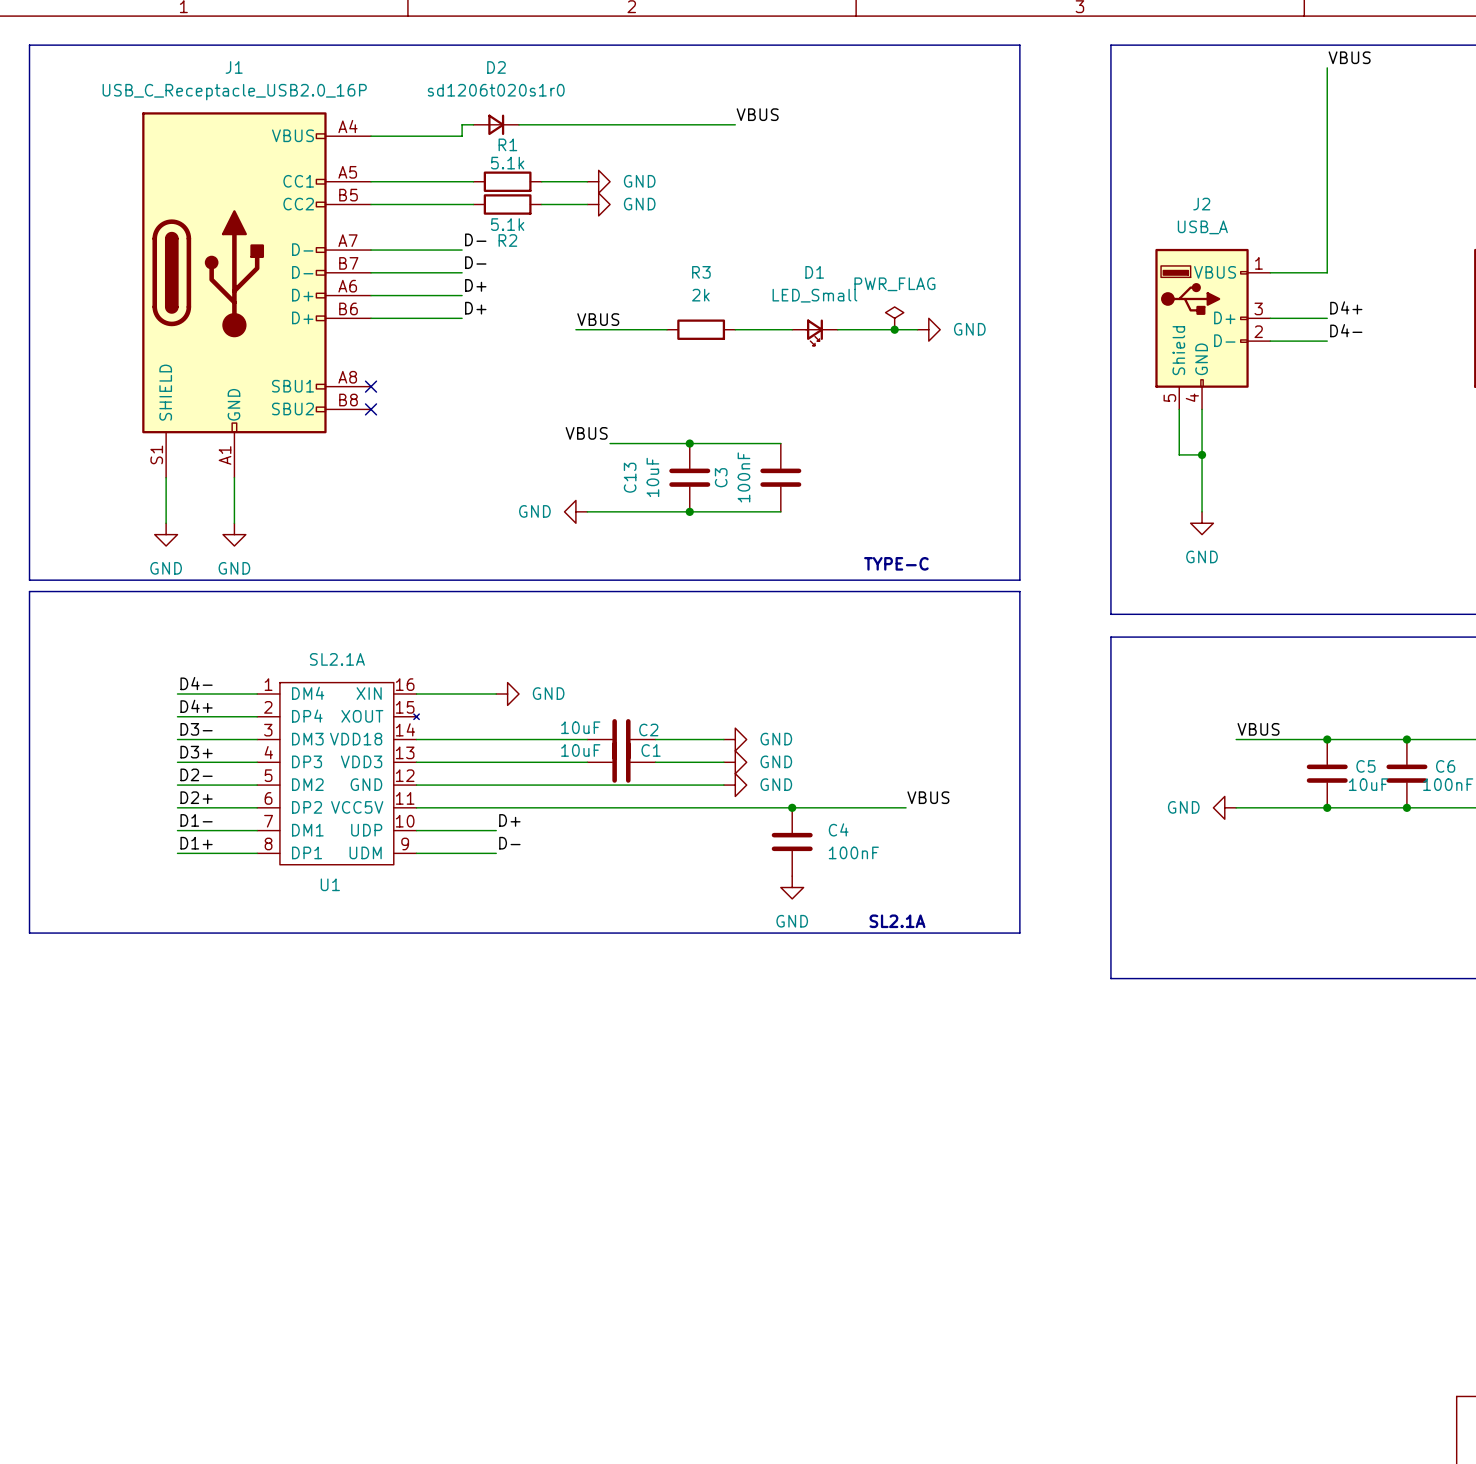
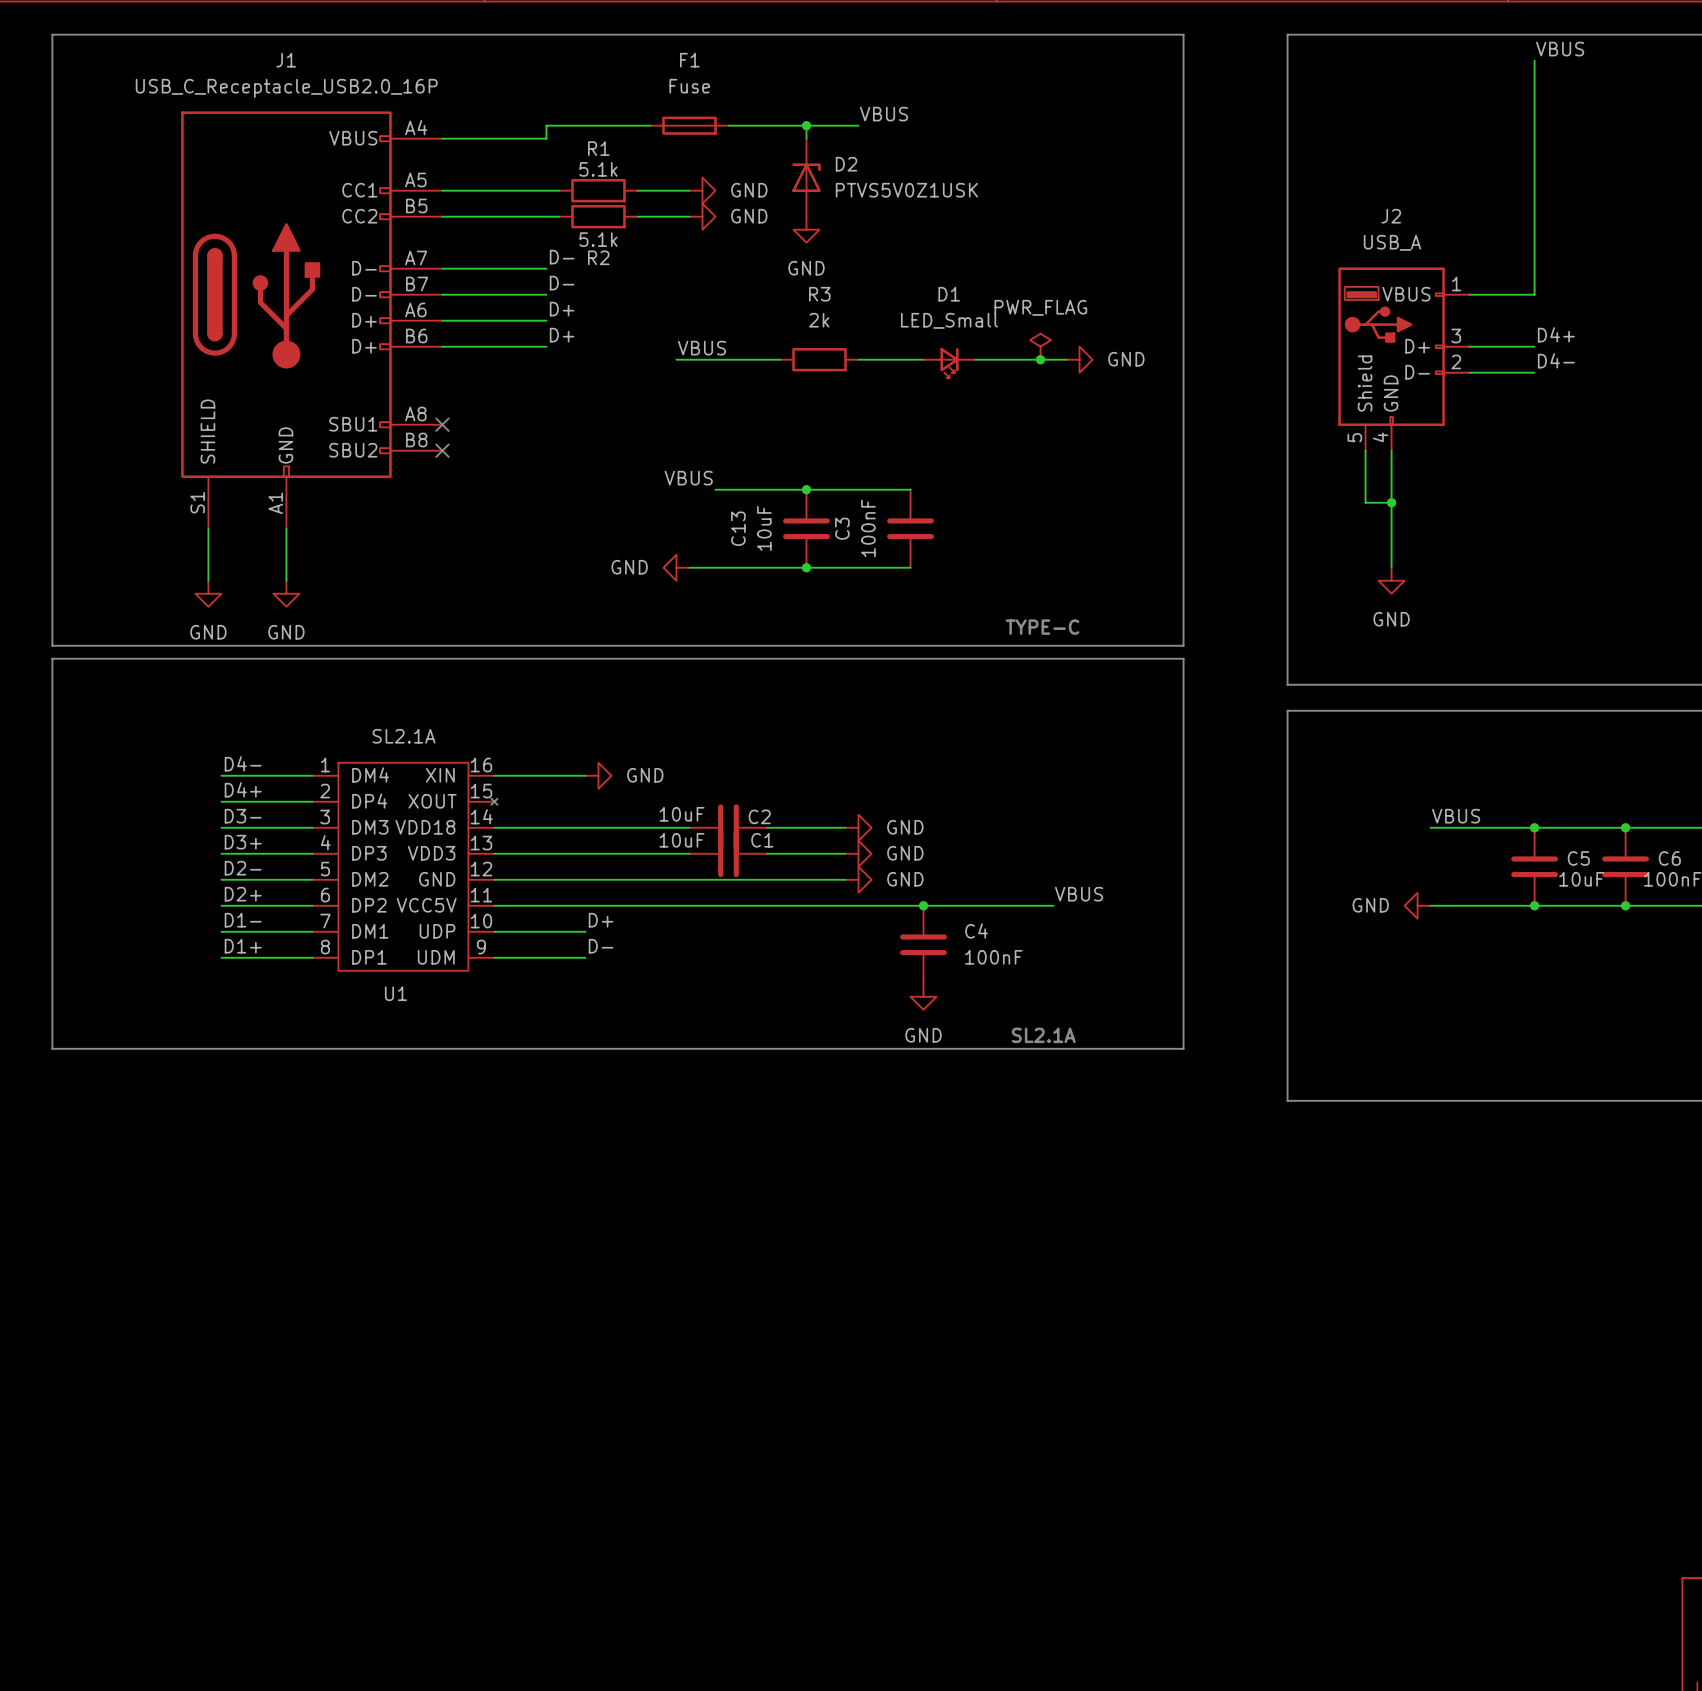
D2 name position: D2 (496, 67) -> D2 (846, 164)
D2 value: sd1206t020s1r0 (496, 90) -> PTVS5V0Z1USK (906, 190)
D2 symbol: [473, 114, 520, 136] -> [792, 138, 821, 217]
F1: none -> Fuse (689, 125)
wire: none -> (806, 125) (806, 138)
junction: none -> (806, 125)
power symbol: none -> GND (806, 229)

